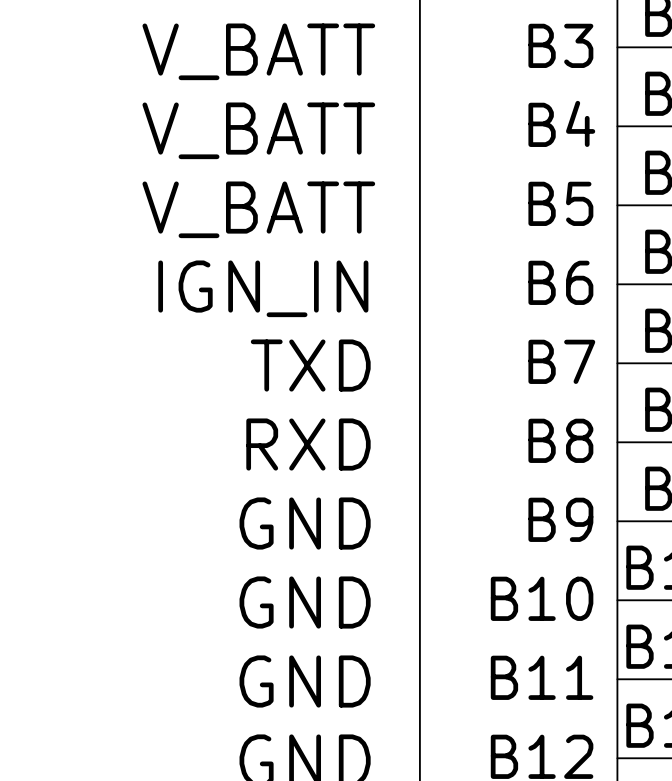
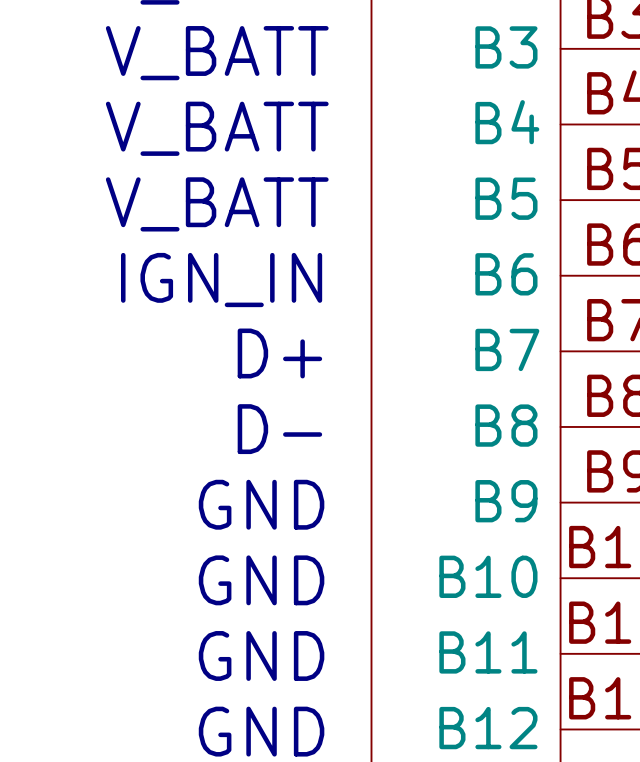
text: TXD (310, 365) -> D+ (279, 353)
text: RXD (308, 444) -> D- (279, 429)

